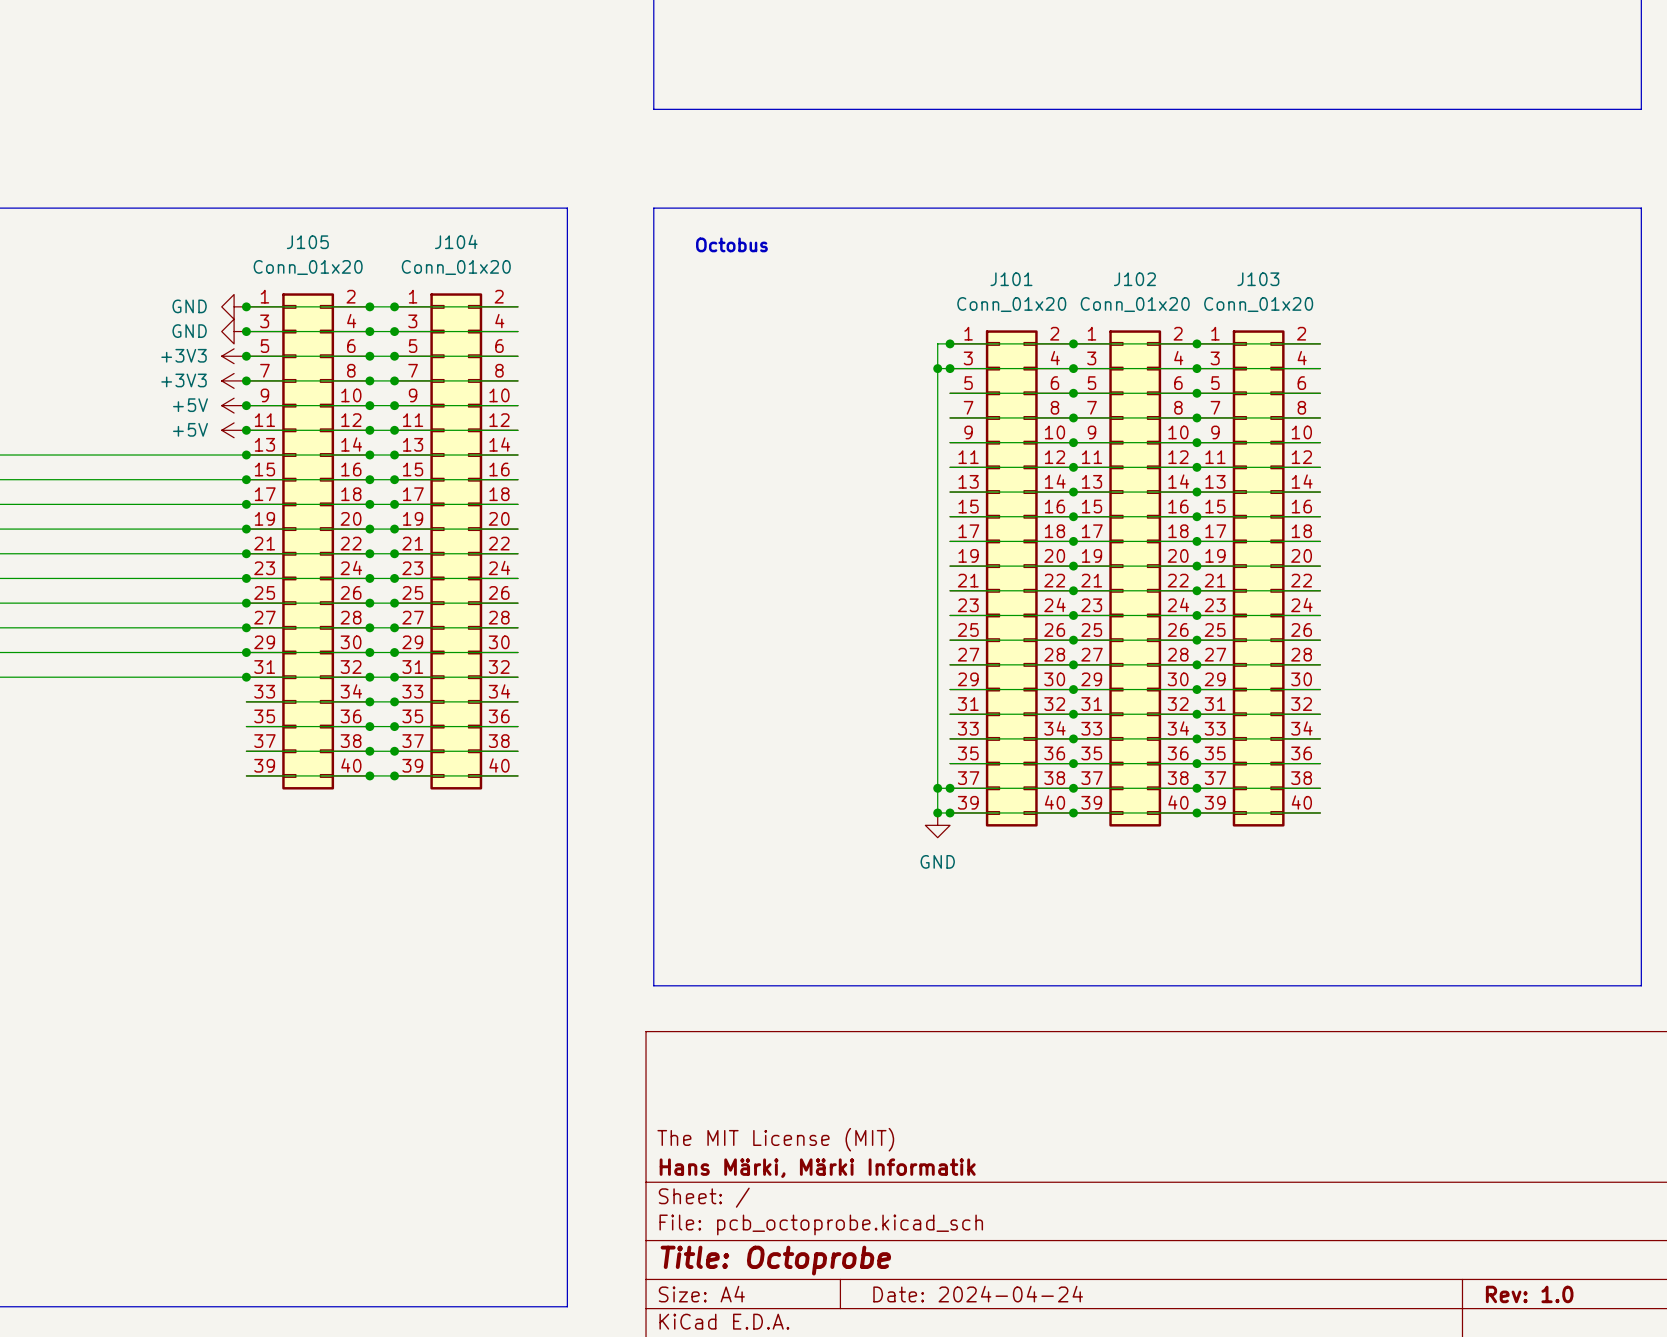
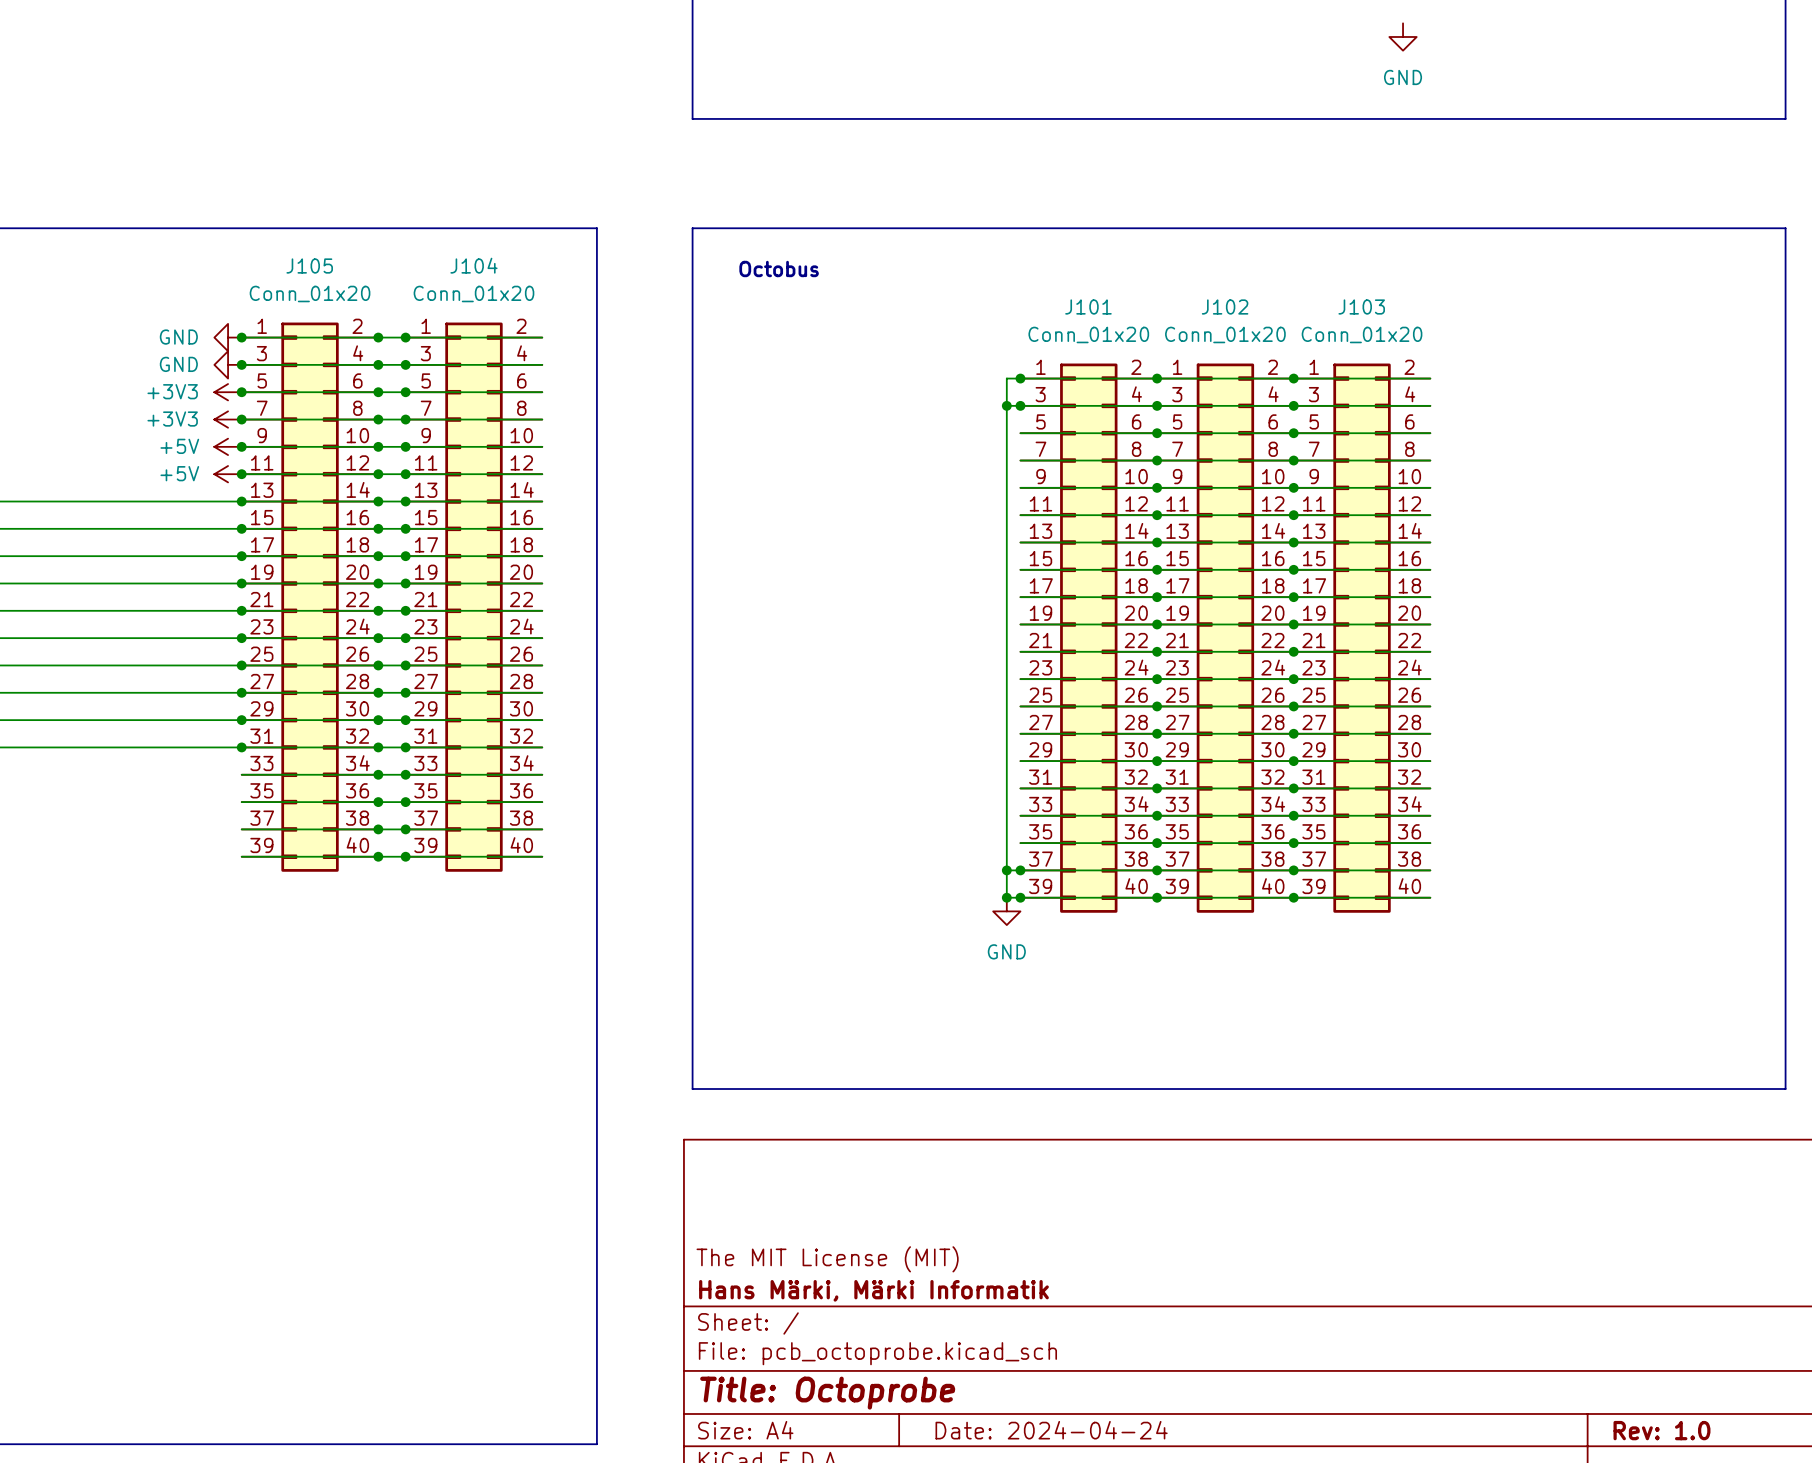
power symbol: none -> GND (1403, 36)

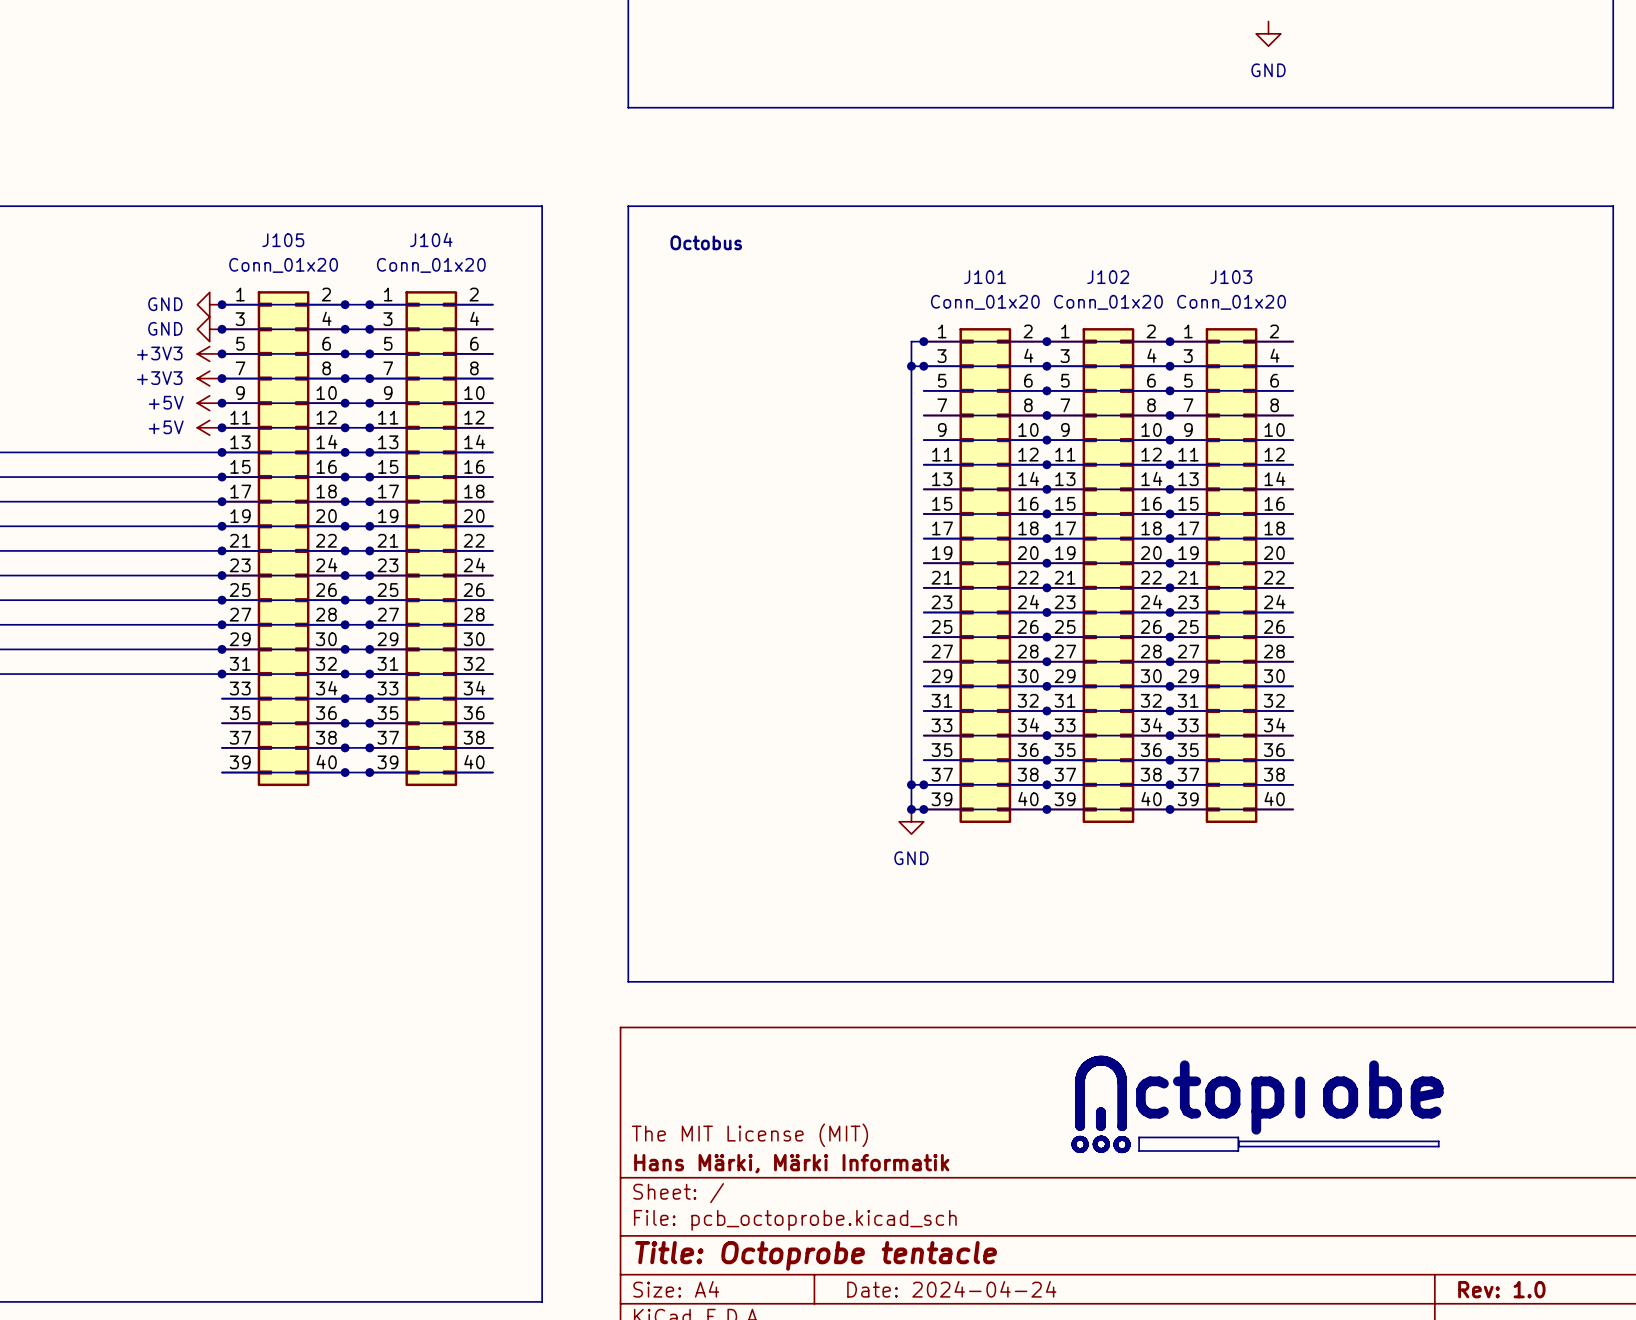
line: none -> (1184, 1065) (1184, 1106) (1187, 1111) (1196, 1113)
line: none -> (1374, 1065) (1374, 1113)
line: none -> (1080, 1081) (1081, 1073) (1086, 1066) (1093, 1062) (1101, 1060) (1109, 1062) (1116, 1066) (1120, 1073) (1122, 1081)
line: none -> (1177, 1081) (1196, 1081)
line: none -> (1219, 1081) (1230, 1083) (1235, 1090) (1235, 1104) (1233, 1109) (1226, 1113) (1214, 1111) (1210, 1104) (1210, 1090) (1214, 1083) (1219, 1081)
line: none -> (1256, 1081) (1256, 1129)
line: none -> (1300, 1081) (1300, 1113)
line: none -> (1337, 1081) (1348, 1083) (1353, 1090) (1353, 1104) (1350, 1109) (1344, 1113) (1332, 1111) (1327, 1104) (1327, 1090) (1332, 1083) (1337, 1081)
line: none -> (1080, 1082) (1080, 1126) (1080, 1126) (1080, 1082) (1080, 1082)
line: none -> (1121, 1082) (1121, 1126) (1122, 1126) (1122, 1082) (1121, 1082)
line: none -> (1163, 1083) (1159, 1081) (1150, 1081) (1145, 1083) (1140, 1090) (1140, 1104) (1145, 1111) (1150, 1113) (1159, 1113) (1163, 1111)
line: none -> (1256, 1083) (1260, 1081) (1270, 1081) (1274, 1083) (1279, 1090) (1279, 1104) (1274, 1111) (1270, 1113) (1260, 1113) (1256, 1111)
line: none -> (1374, 1083) (1378, 1081) (1387, 1081) (1392, 1083) (1397, 1090) (1397, 1104) (1392, 1111) (1387, 1113) (1378, 1113) (1374, 1111)
line: none -> (1415, 1097) (1438, 1092) (1436, 1083) (1431, 1081) (1422, 1081) (1417, 1083) (1415, 1088) (1415, 1106) (1417, 1111) (1422, 1113) (1431, 1113) (1436, 1111)
line: none -> (1100, 1112) (1100, 1126) (1101, 1126) (1101, 1112) (1100, 1112)
line: none -> (1139, 1137) (1139, 1150) (1238, 1150) (1238, 1137) (1139, 1137)
line: none -> (1079, 1138) (1075, 1140) (1074, 1145) (1076, 1149) (1081, 1150) (1085, 1148) (1086, 1143) (1083, 1139) (1079, 1138)
line: none -> (1100, 1138) (1096, 1140) (1095, 1145) (1097, 1149) (1102, 1150) (1106, 1147) (1107, 1143) (1104, 1139) (1100, 1138)
line: none -> (1121, 1138) (1117, 1140) (1115, 1144) (1117, 1149) (1122, 1150) (1126, 1148) (1128, 1144) (1126, 1140) (1121, 1138)
line: none -> (1238, 1141) (1238, 1146) (1438, 1146) (1438, 1141) (1238, 1141)
title block: Title: Octoprobe (827, 1393) -> Title: Octoprobe tentacle (816, 1255)

